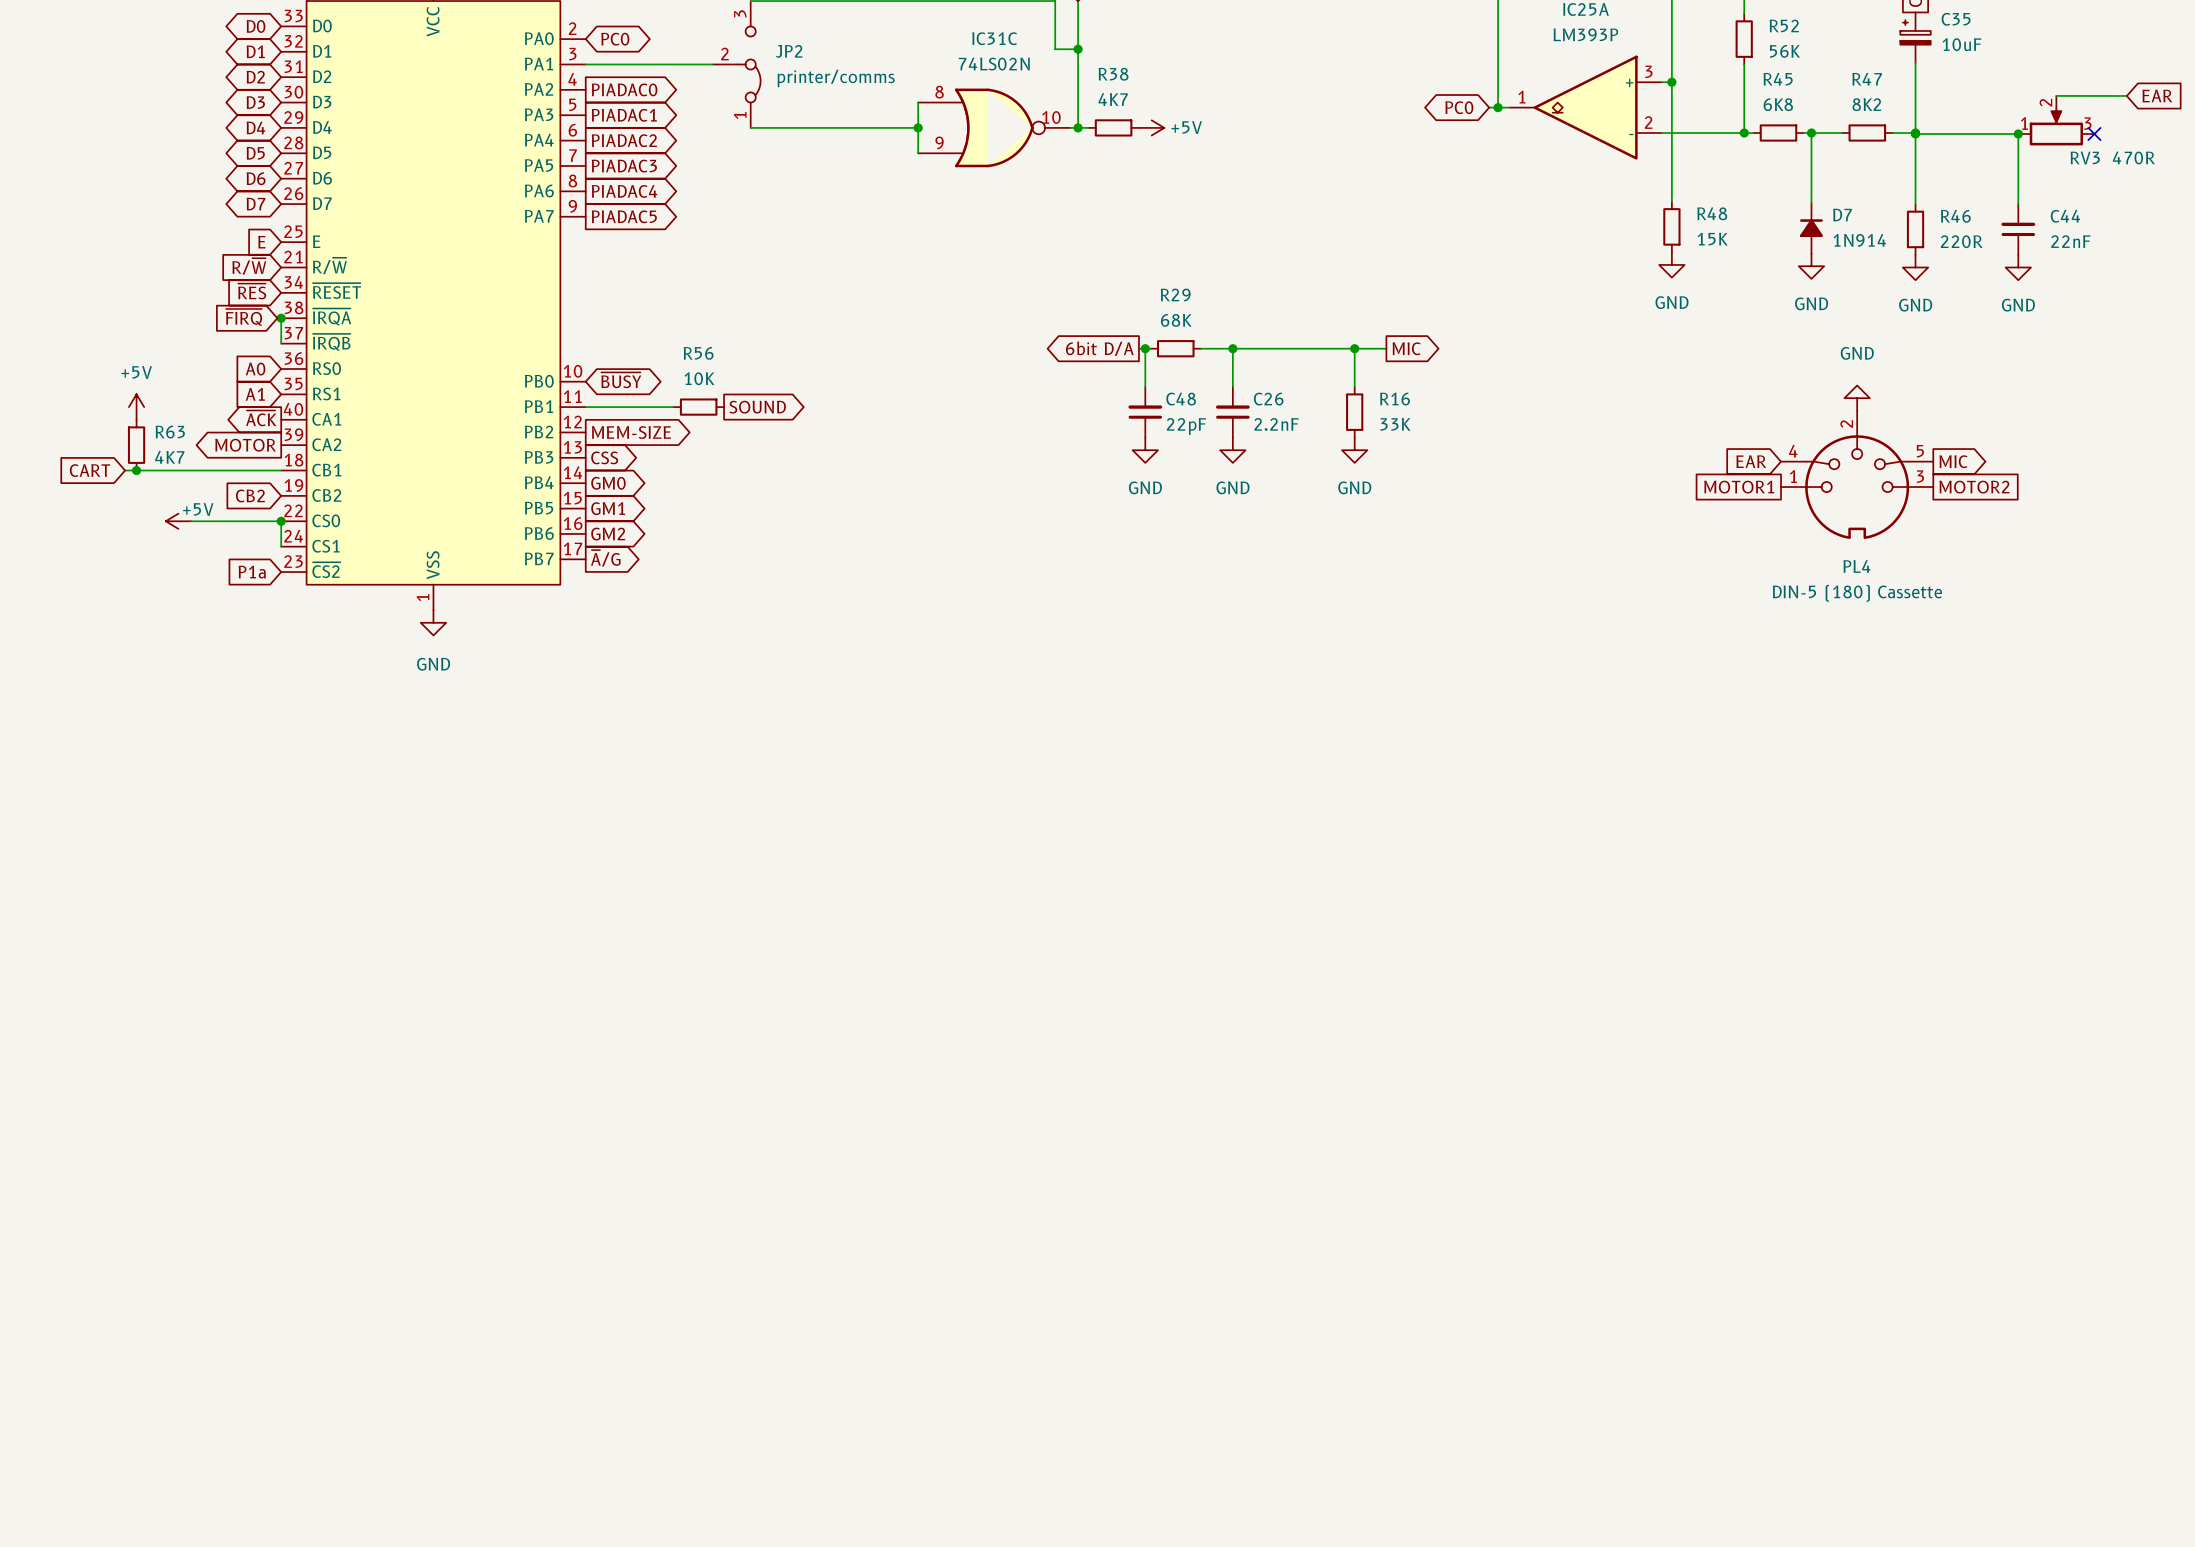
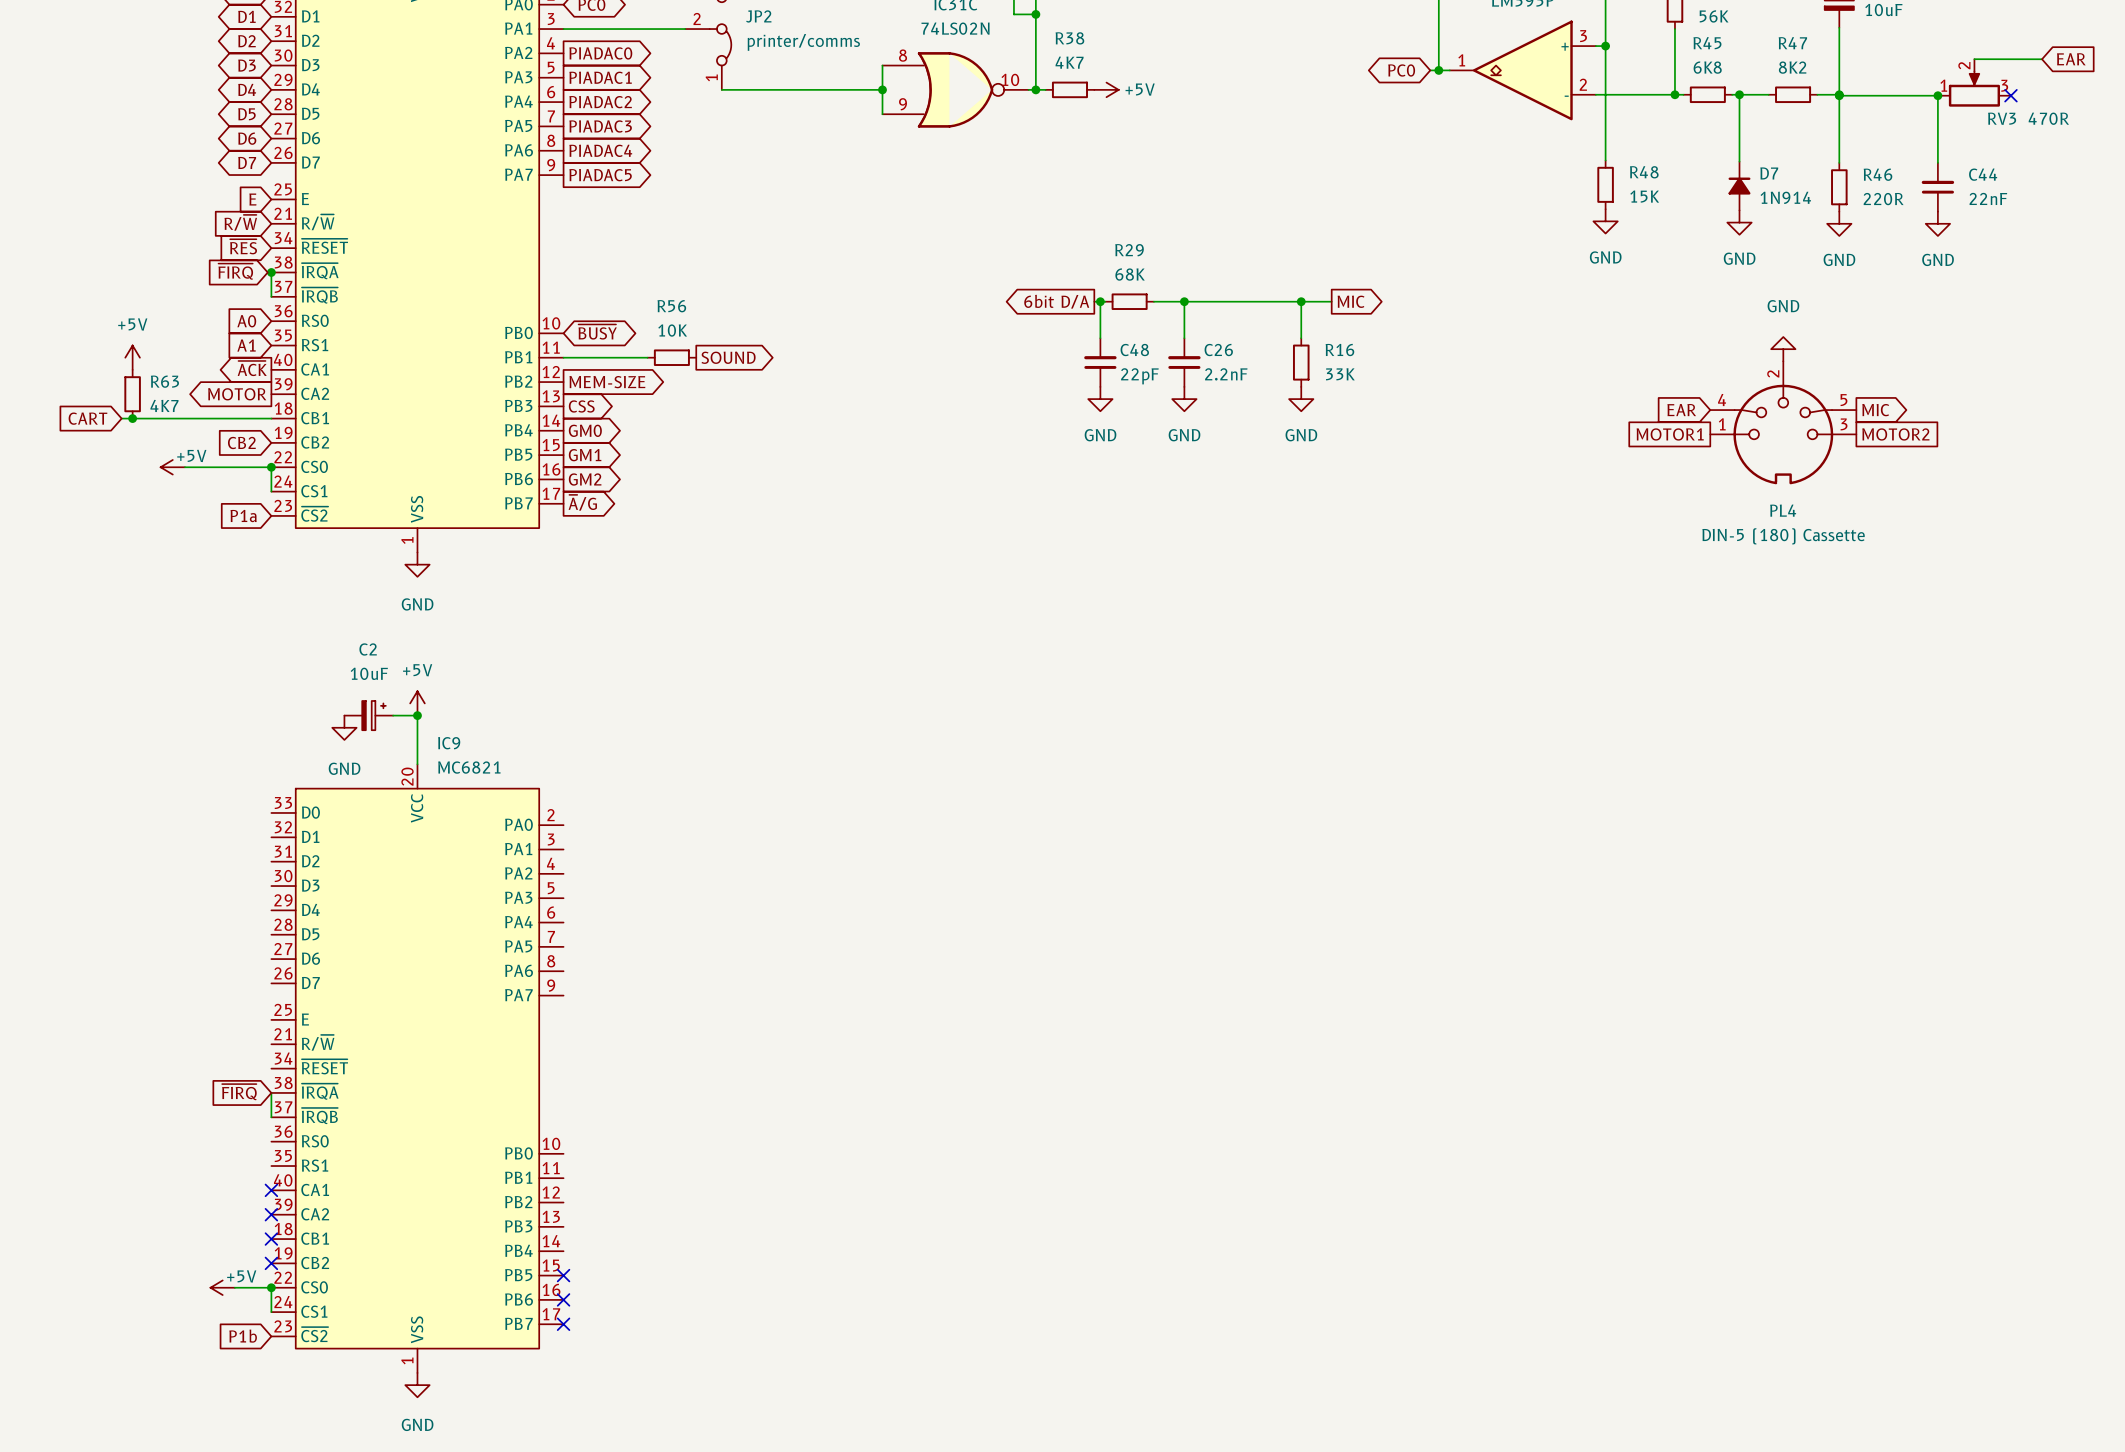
power symbol: none -> +5V (417, 703)
C2: none -> 10uF (368, 715)
wire: none -> (393, 715) (417, 715) (417, 764)
junction: none -> (417, 715)
power symbol: none -> GND (344, 727)
IC9: none -> MC6821 (417, 1068)
global label: none -> ~{FIRQ} (239, 1092)
wire: none -> (271, 1092) (271, 1117)
no-connect mark: none -> (271, 1190)
no-connect mark: none -> (271, 1214)
no-connect mark: none -> (271, 1239)
no-connect mark: none -> (271, 1263)
no-connect mark: none -> (563, 1275)
power symbol: none -> +5V (222, 1287)
wire: none -> (234, 1287) (271, 1287) (271, 1312)
junction: none -> (271, 1287)
no-connect mark: none -> (563, 1299)
no-connect mark: none -> (563, 1324)
global label: none -> P1b (243, 1336)
power symbol: none -> GND (417, 1385)

